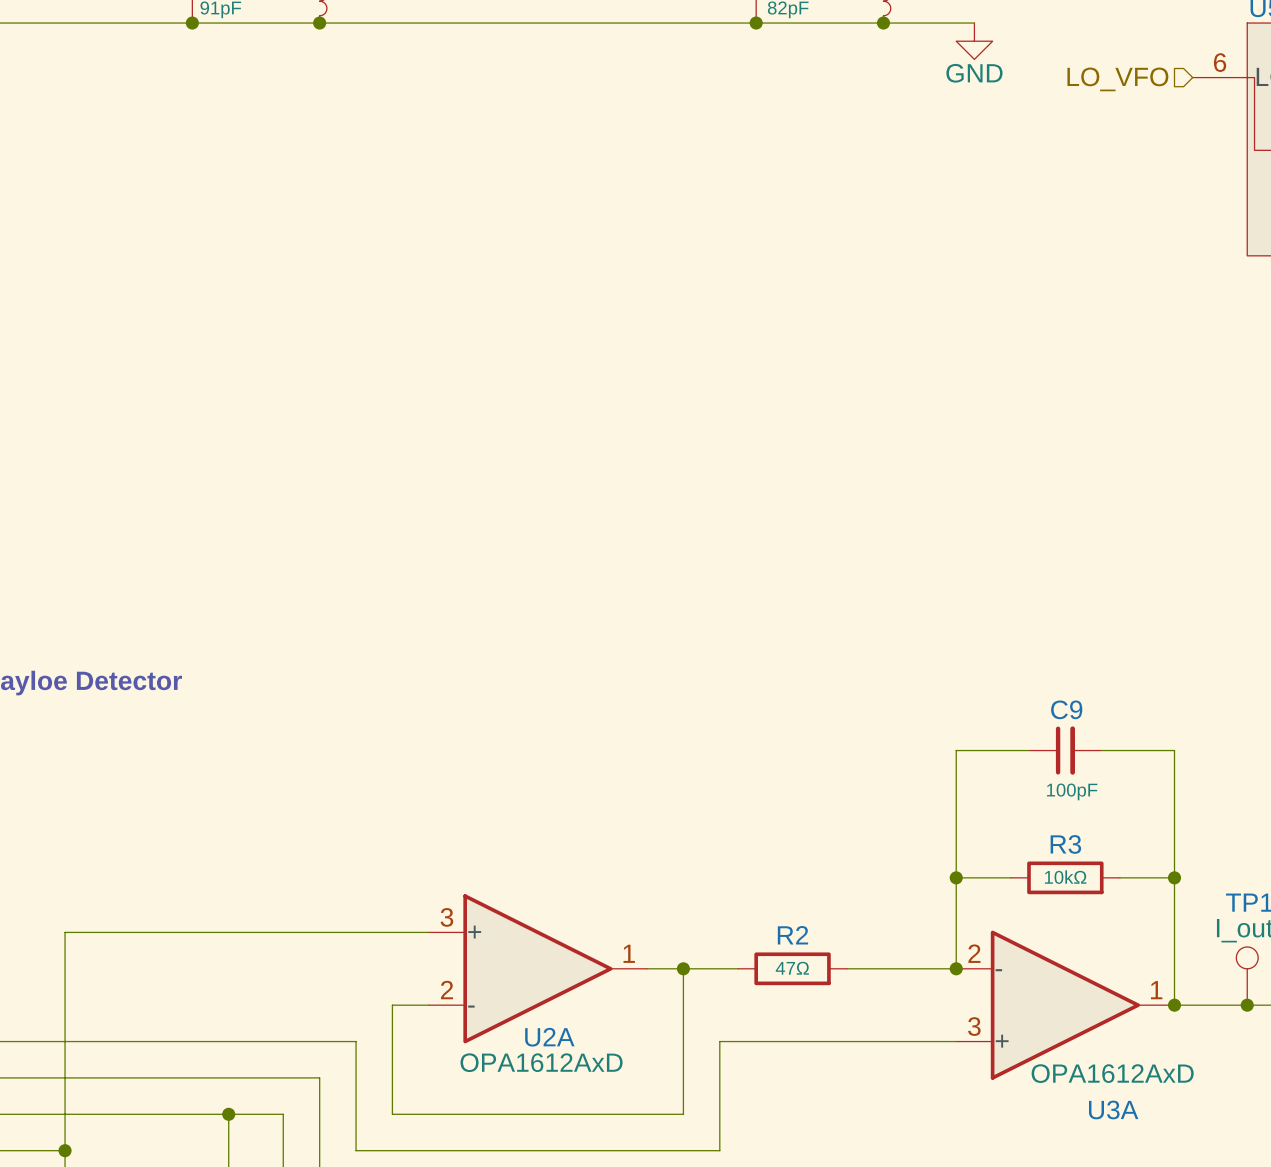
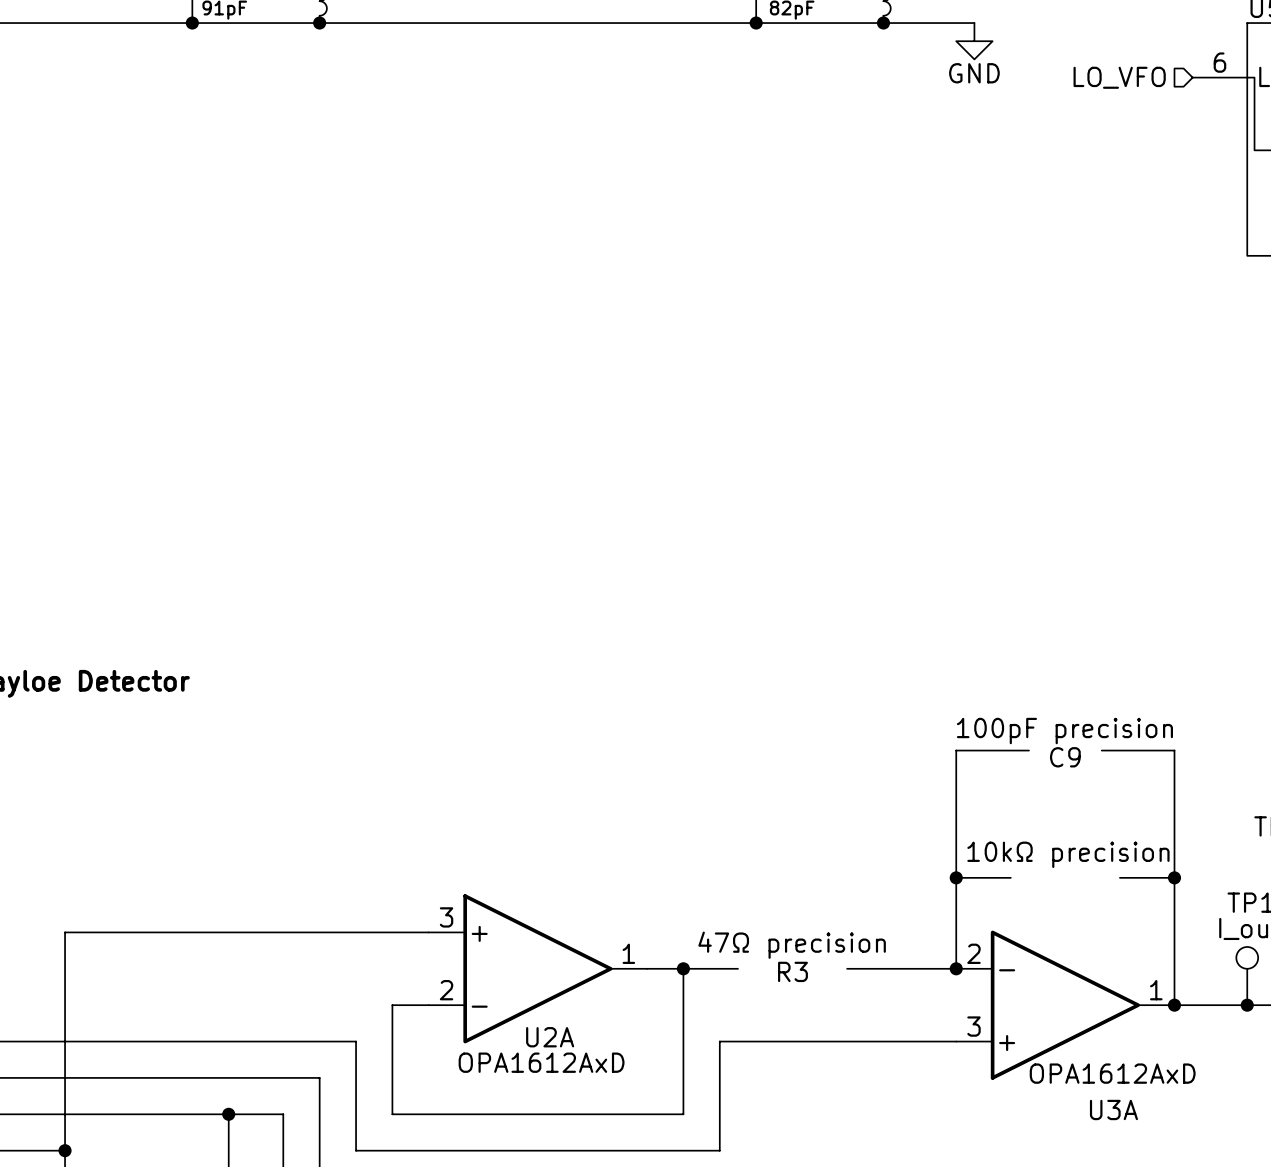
text: none -> 100pF precision (1064, 731)
C9: 100pF (1065, 750) -> none
text: none -> C9 (1065, 757)
text: none -> 10kΩ precision (1068, 854)
R3: 10kΩ (1065, 877) -> none
text: none -> 47Ω precision (792, 945)
R2: 47Ω (792, 968) -> none
text: none -> R3 (792, 971)

